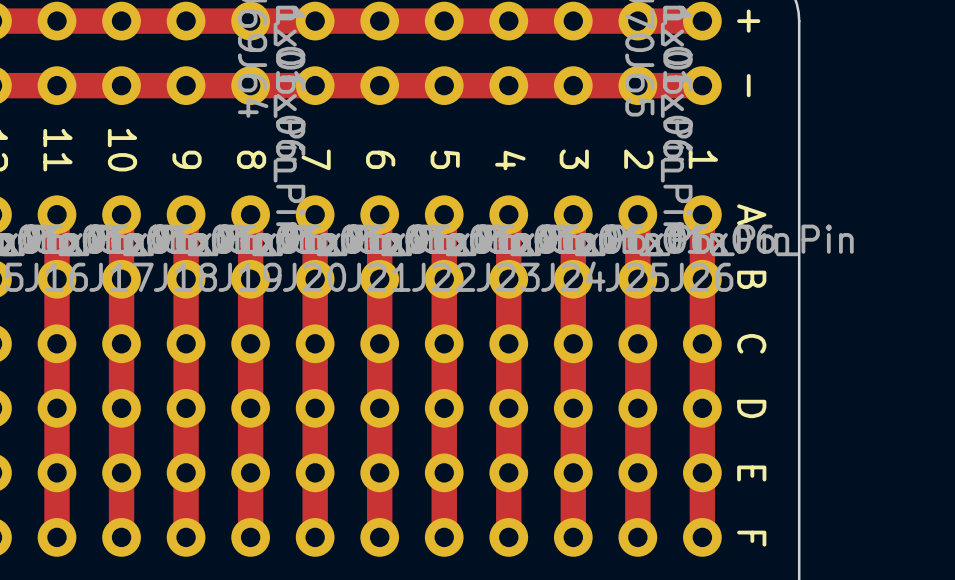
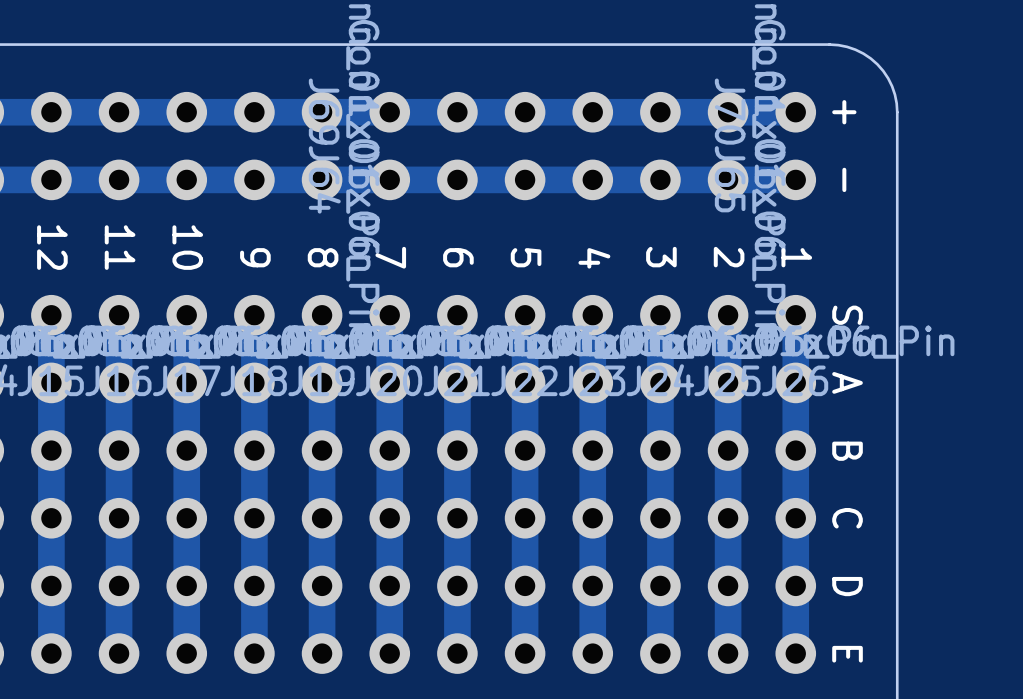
text: A (751, 214) -> S (847, 315)
text: B (751, 279) -> A (847, 382)
text: C (751, 343) -> B (847, 451)
text: D (751, 408) -> C (847, 518)
text: E (751, 473) -> D (847, 586)
text: F (751, 538) -> E (847, 654)

